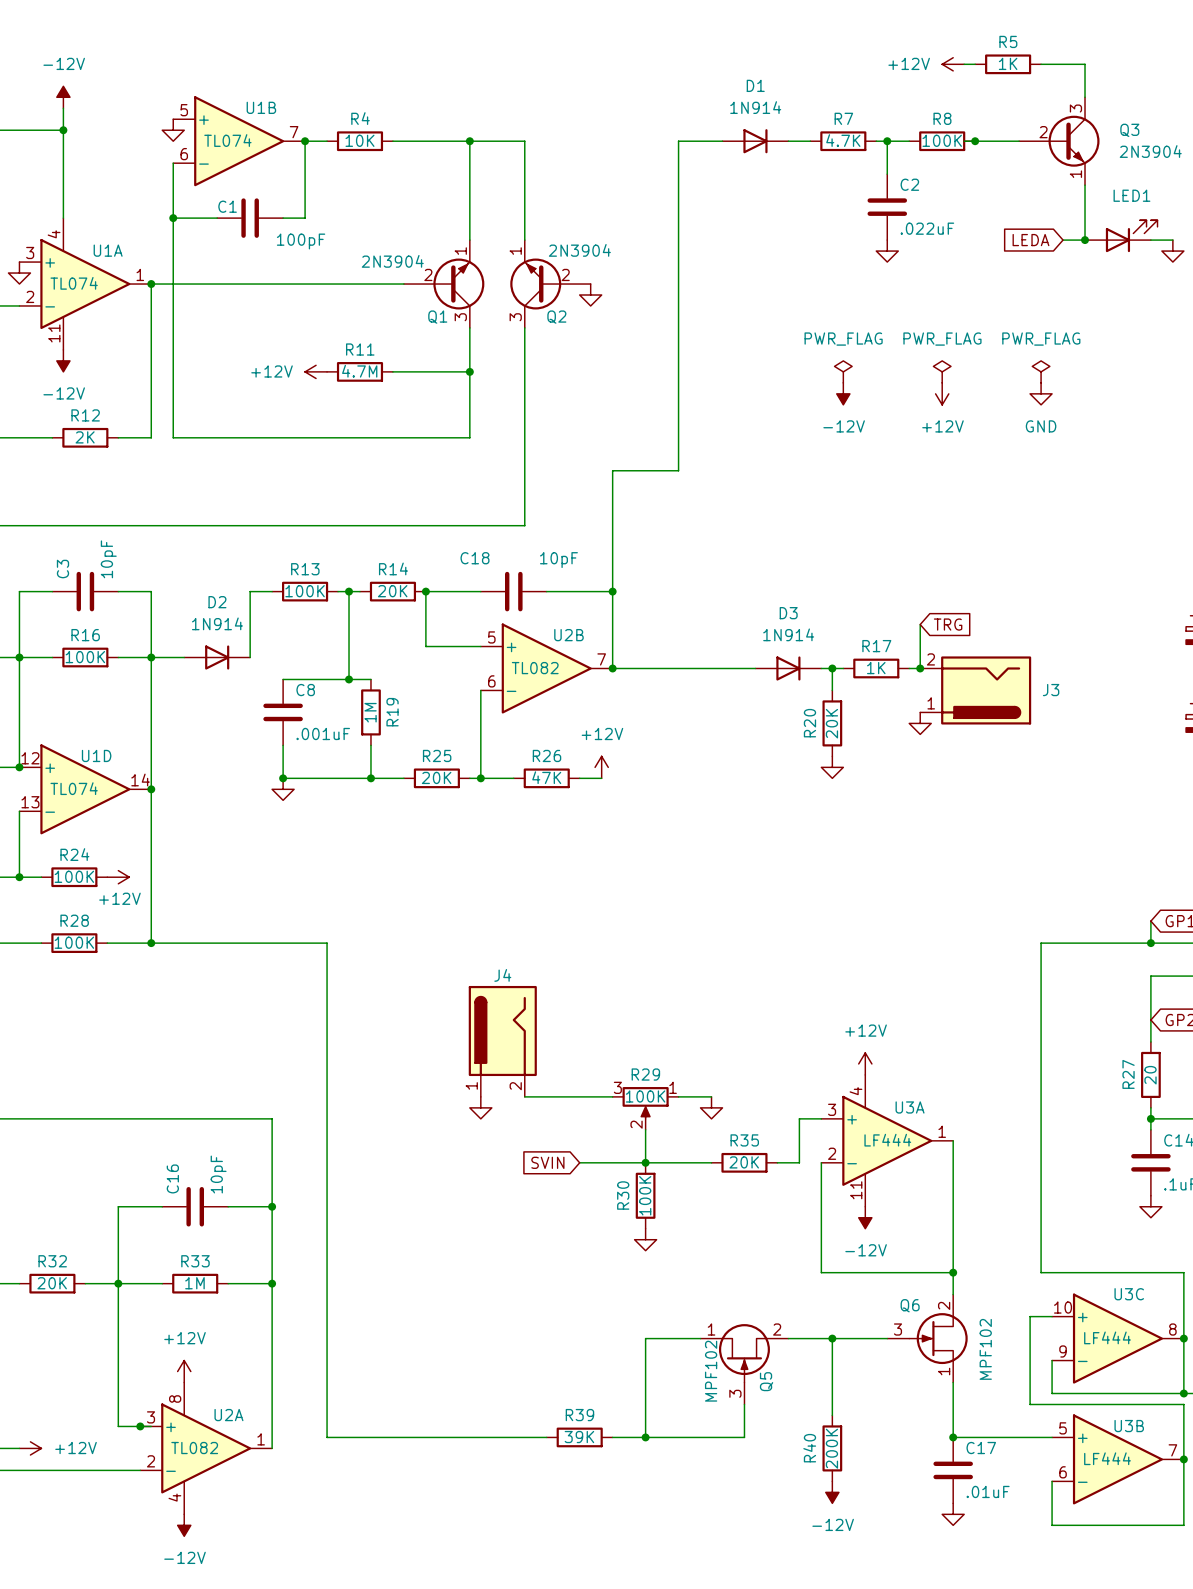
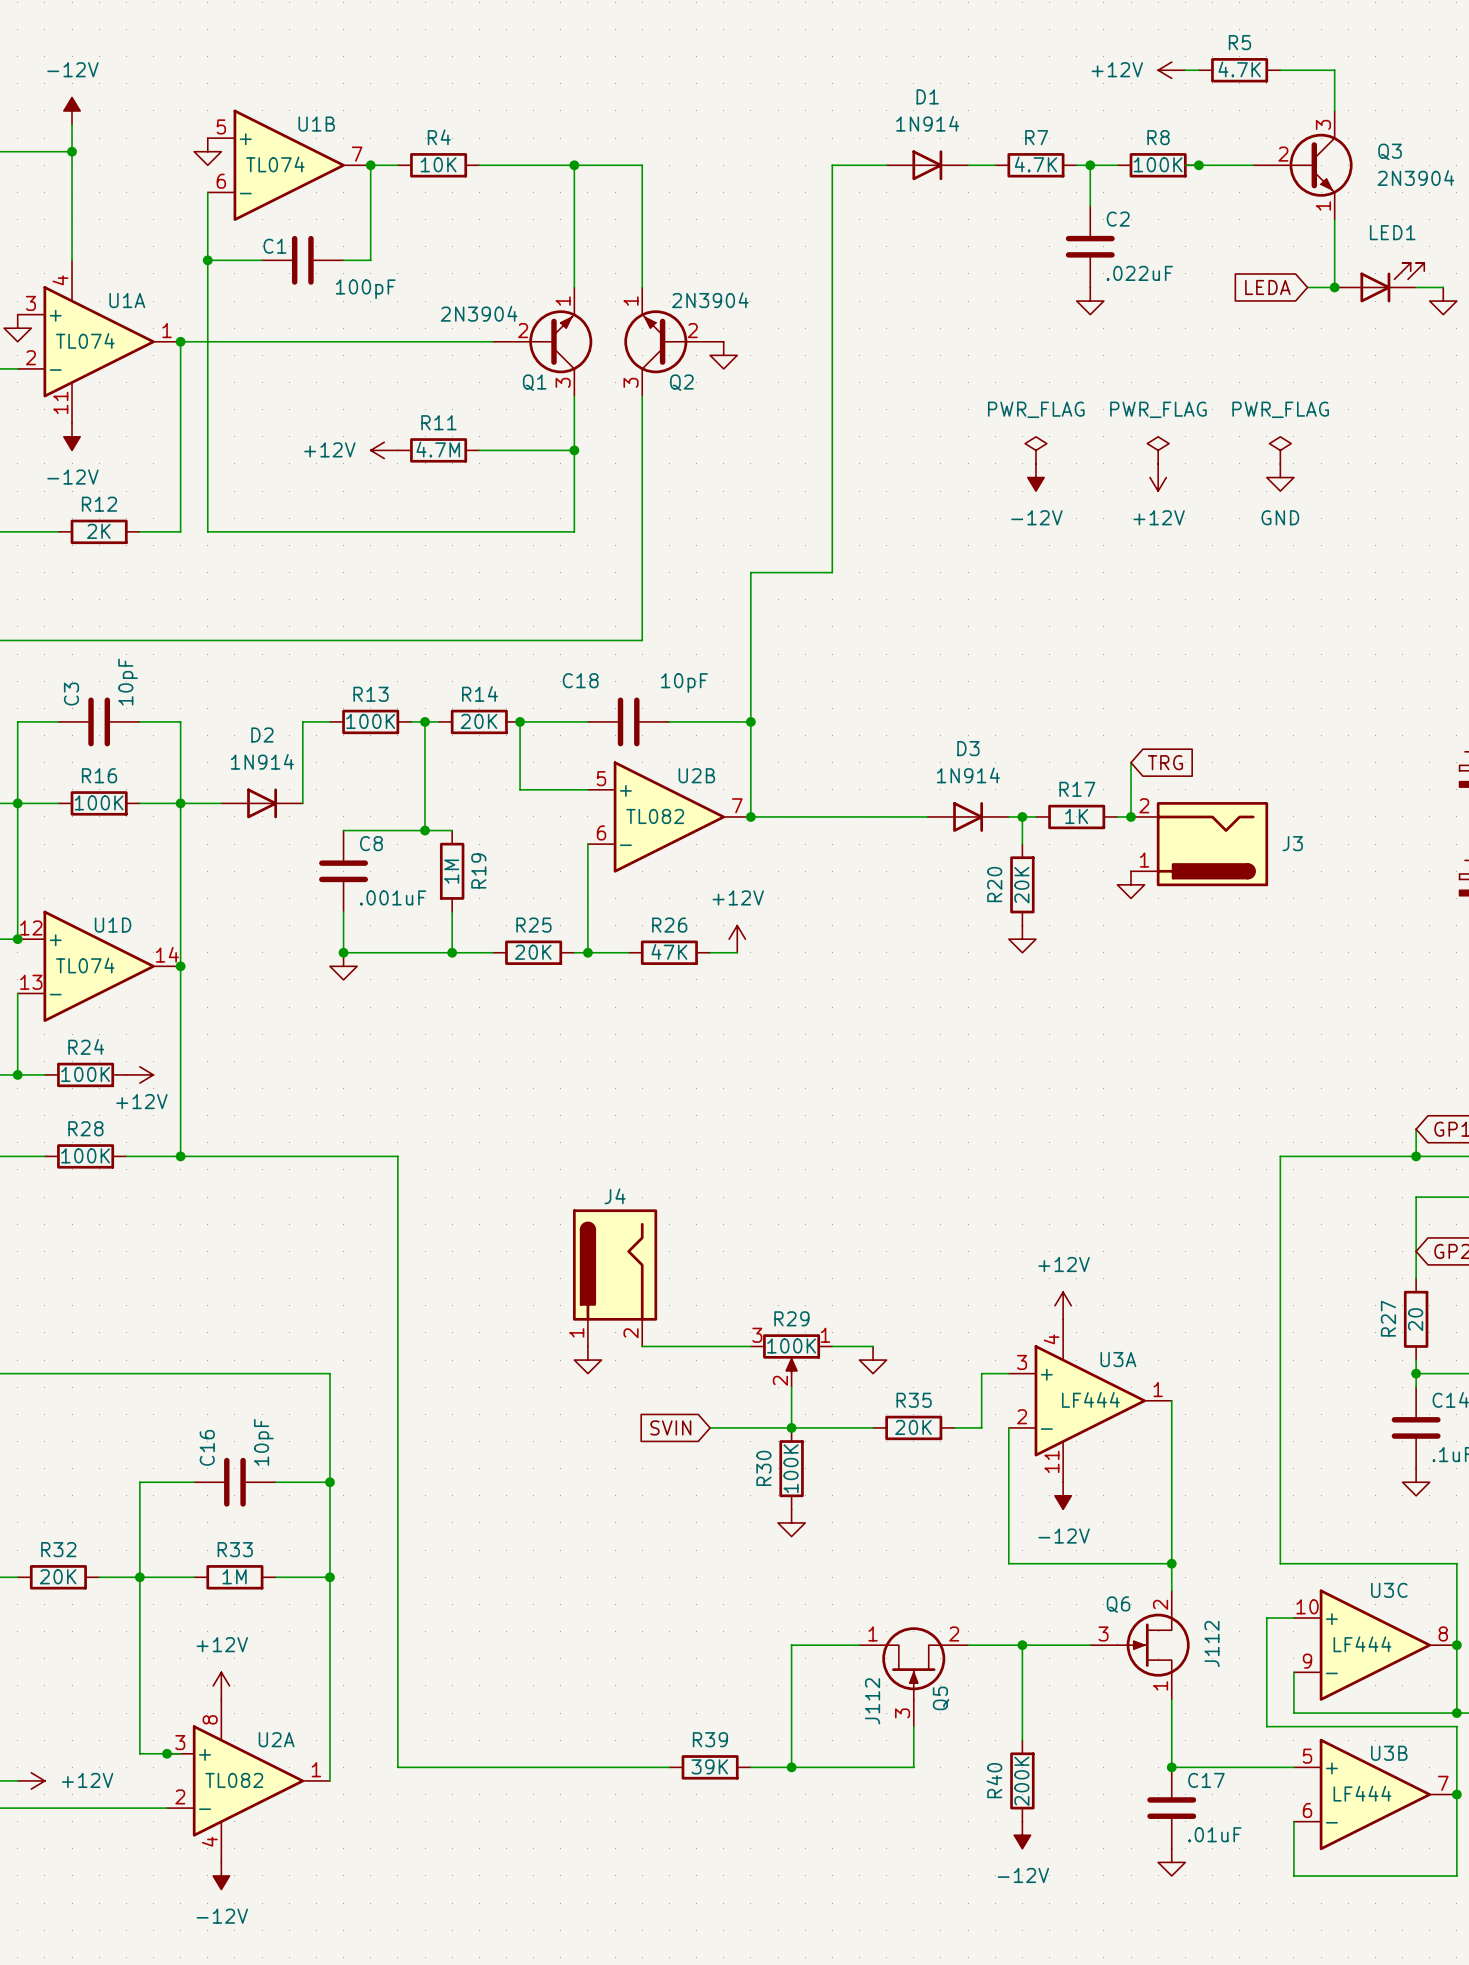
R5 value: 1K (1008, 63) -> 4.7K (1239, 69)
Q6 value: MPF102 (985, 1349) -> J112 (1211, 1643)
Q5 value: MPF102 (711, 1371) -> J112 (872, 1701)

